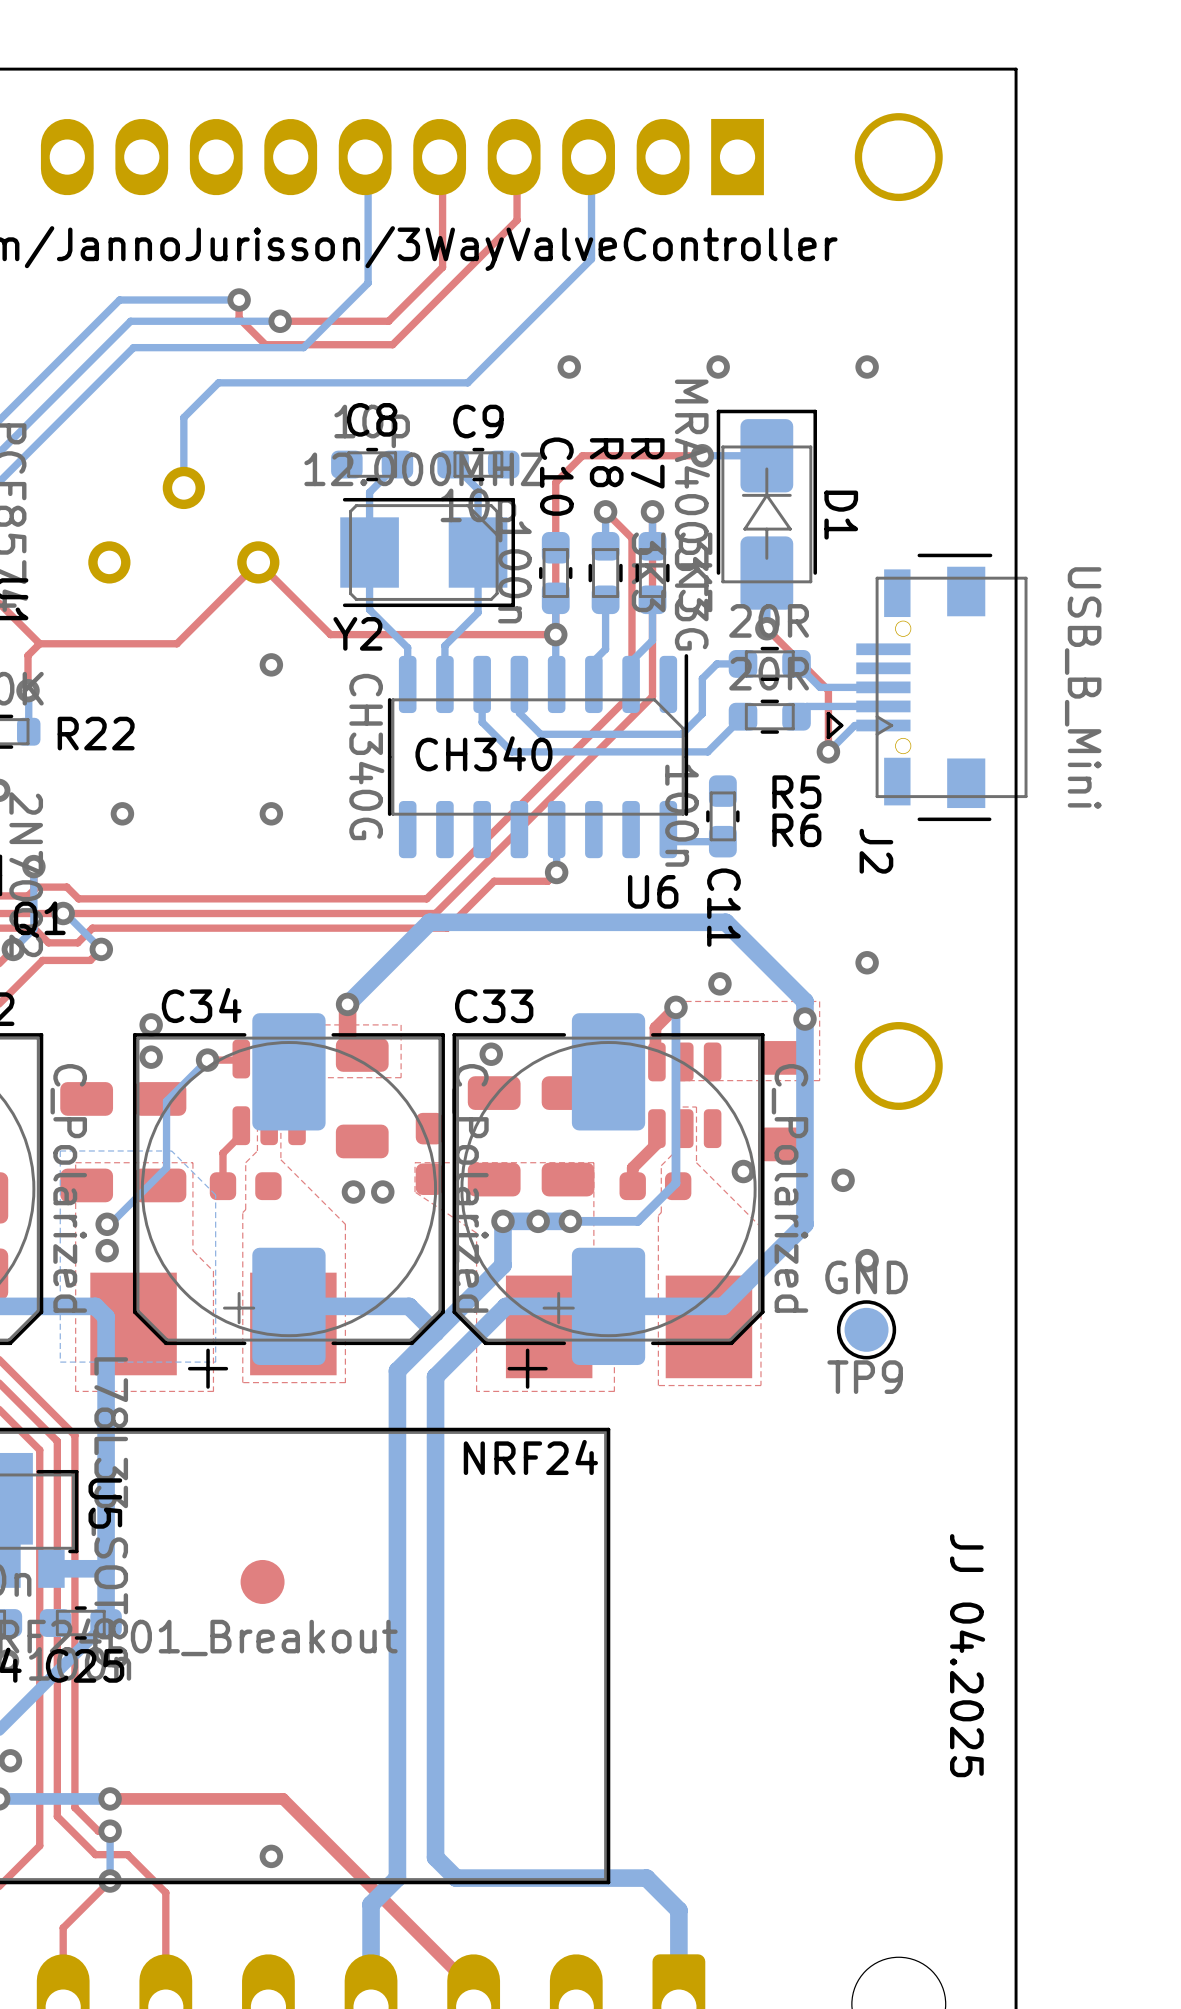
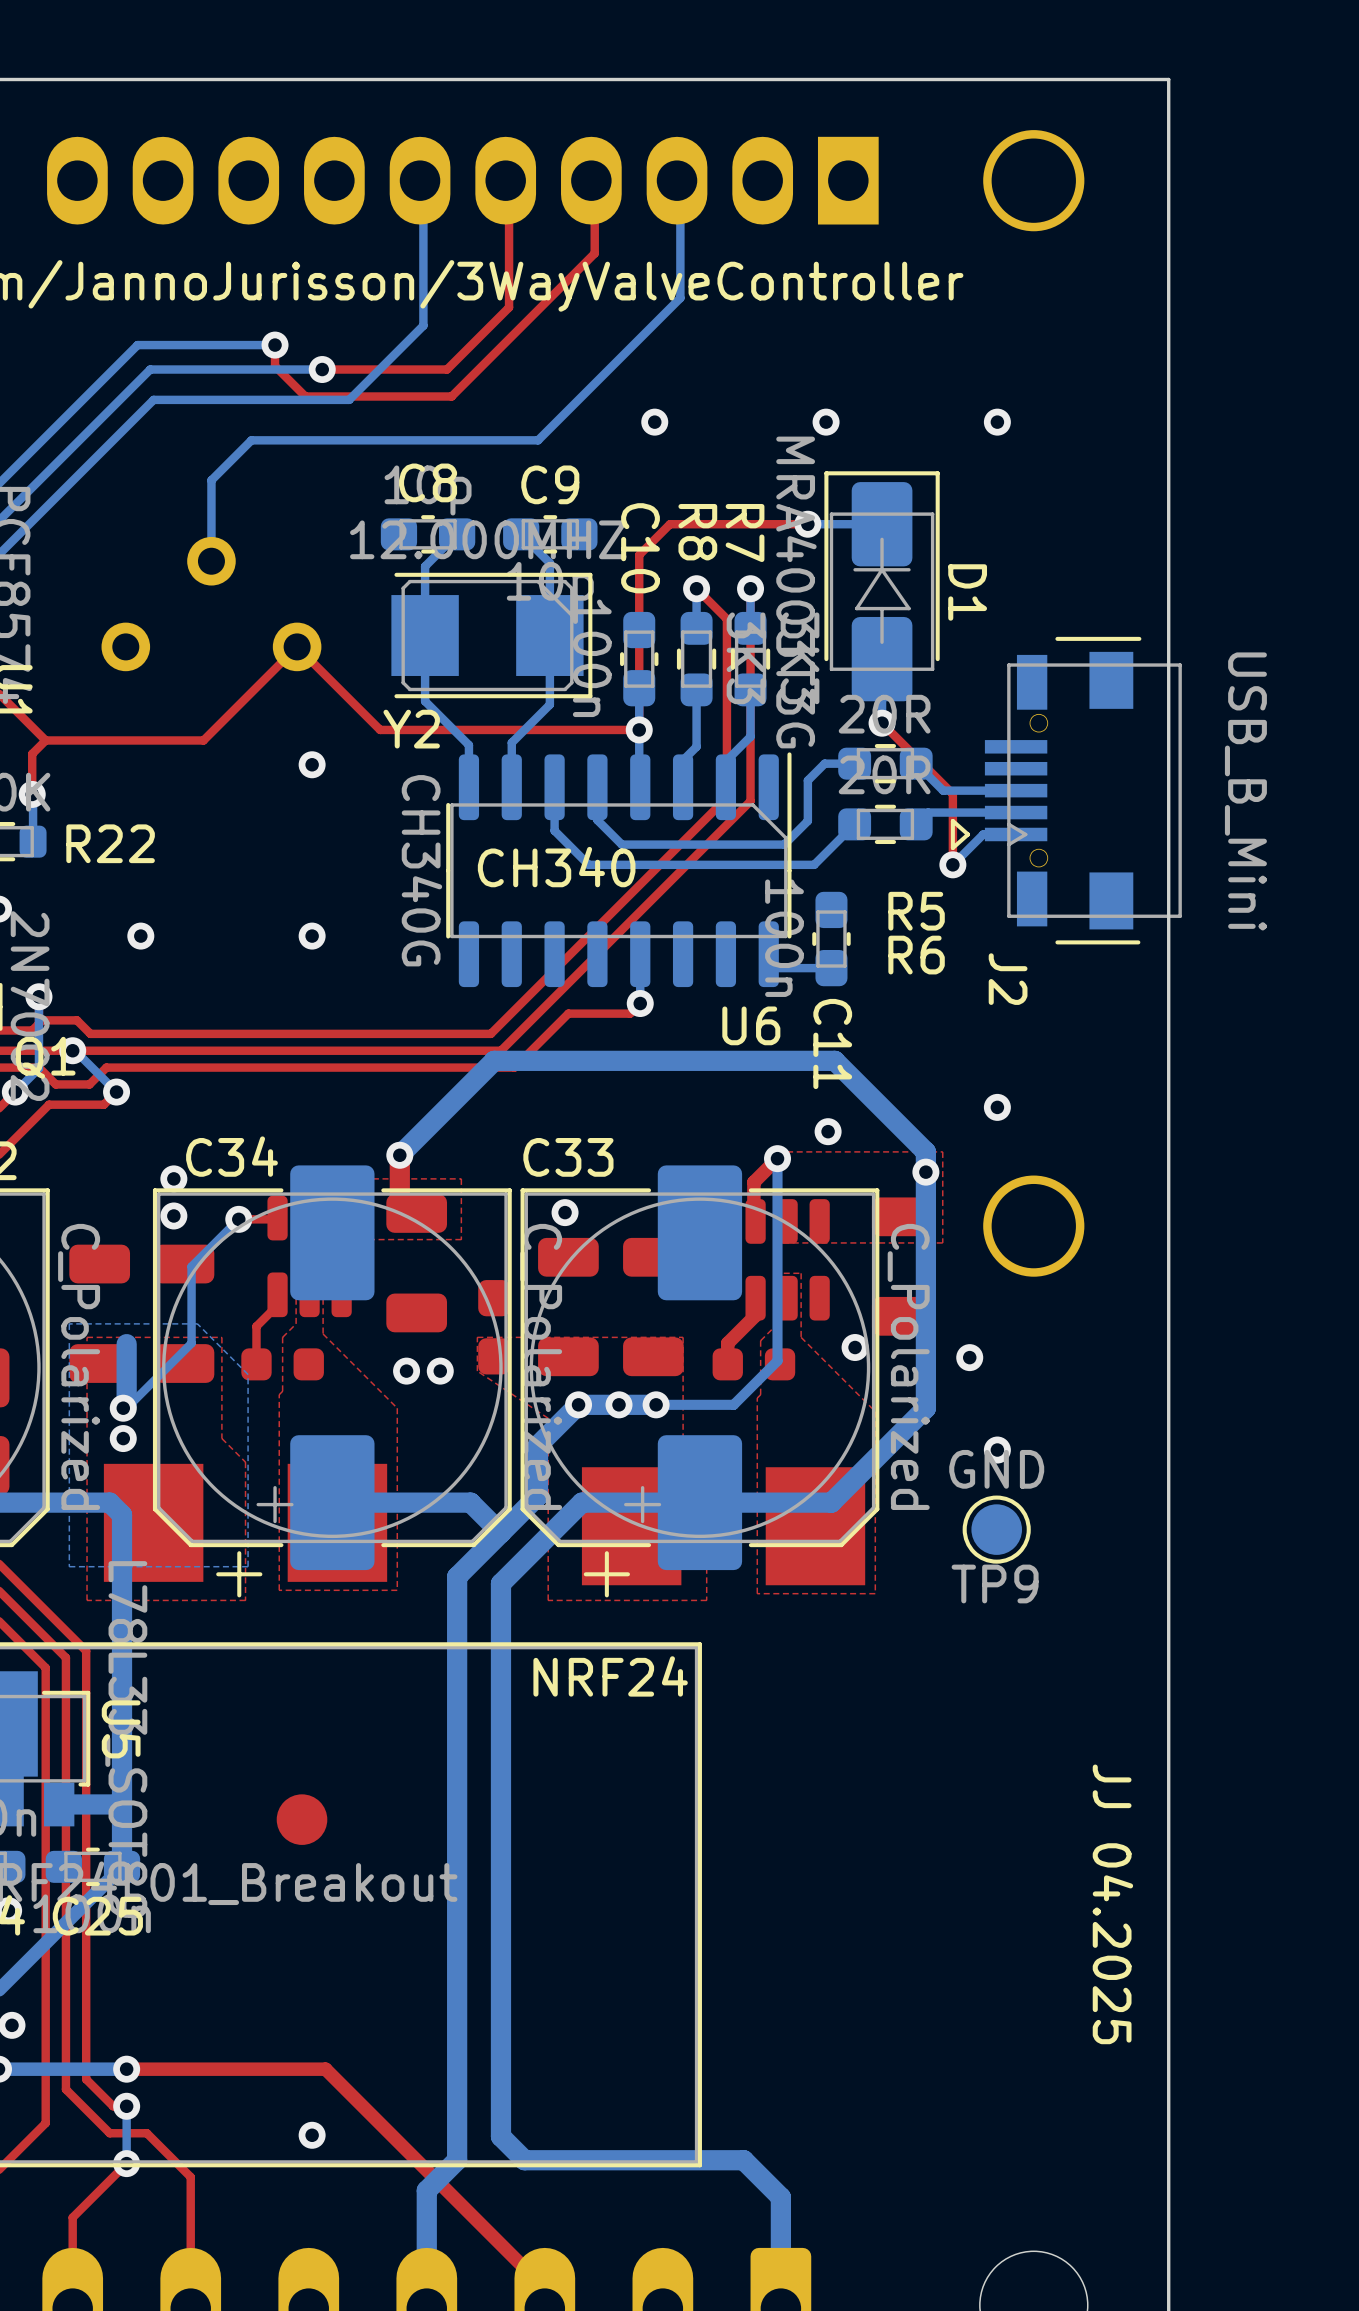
bottom track: none -> (126, 1344) (126, 1404)
bottom track: (502, 1221) (502, 1265) (467, 1300) -> (578, 1404) (538, 1445) (538, 1495)

